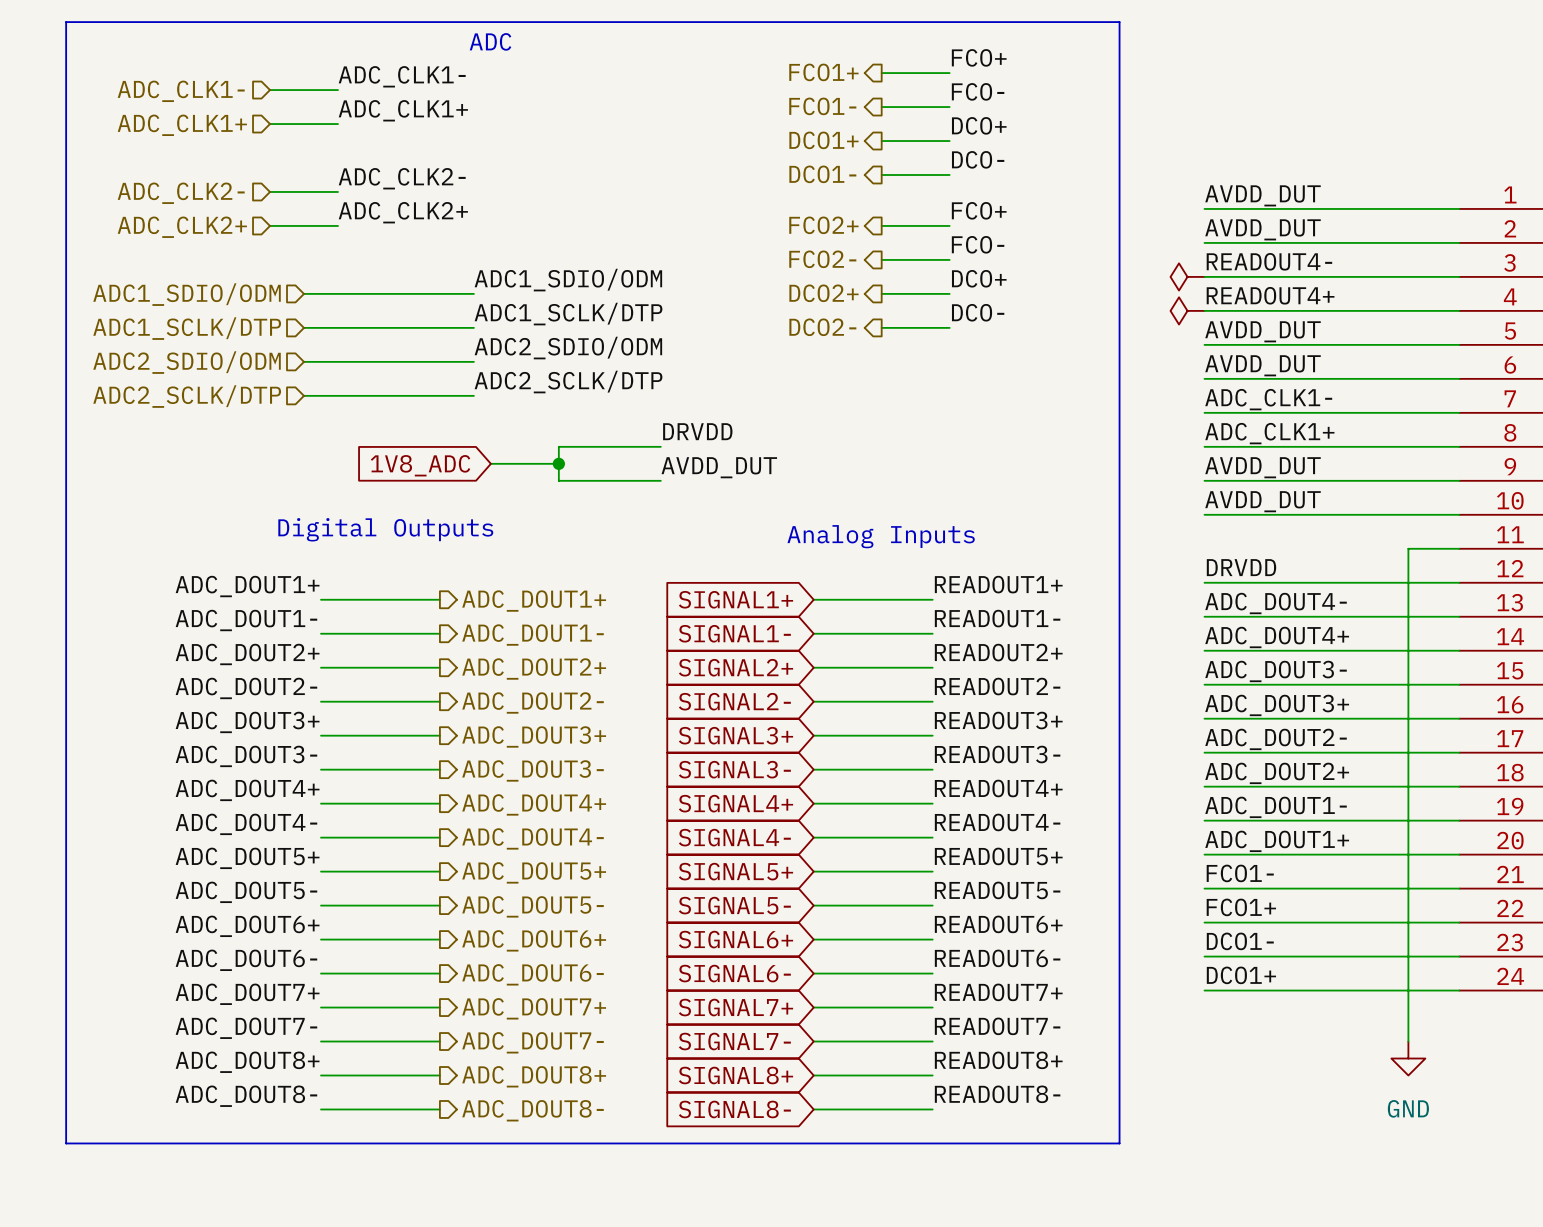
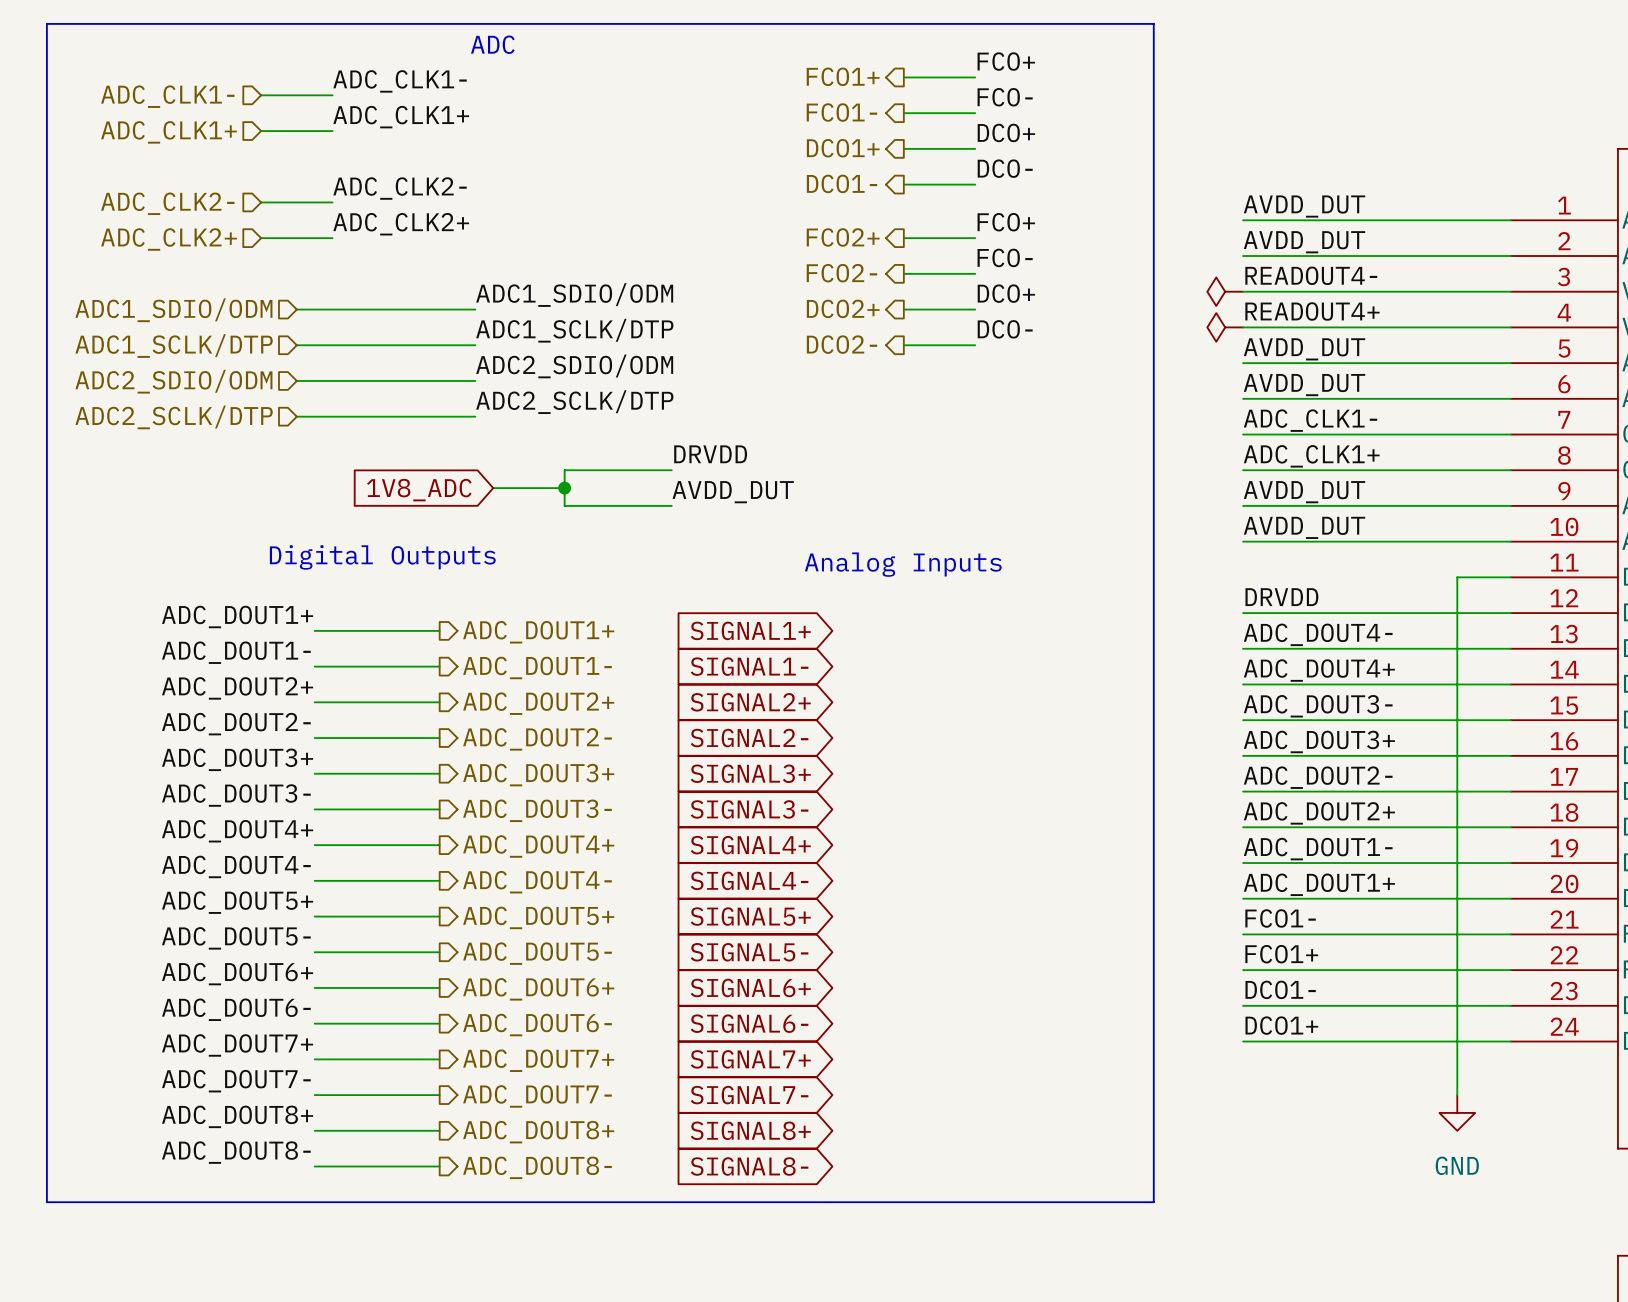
label: READOUT1+ (998, 584) -> none
wire: (813, 599) (932, 599) -> none
label: READOUT1- (997, 618) -> none
wire: (813, 633) (932, 633) -> none
label: READOUT2+ (998, 652) -> none
wire: (813, 667) (932, 667) -> none
label: READOUT2- (997, 686) -> none
wire: (813, 701) (932, 701) -> none
label: READOUT3+ (998, 720) -> none
wire: (813, 735) (932, 735) -> none
label: READOUT3- (997, 754) -> none
wire: (813, 769) (932, 769) -> none
label: READOUT4+ (998, 788) -> none
wire: (813, 803) (932, 803) -> none
label: READOUT4- (997, 822) -> none
wire: (813, 837) (932, 837) -> none
label: READOUT5+ (998, 856) -> none
wire: (813, 871) (932, 871) -> none
label: READOUT5- (997, 890) -> none
wire: (813, 905) (932, 905) -> none
label: READOUT6+ (998, 924) -> none
wire: (813, 939) (932, 939) -> none
label: READOUT6- (997, 958) -> none
wire: (813, 973) (932, 973) -> none
label: READOUT7+ (998, 992) -> none
wire: (813, 1007) (932, 1007) -> none
label: READOUT7- (997, 1026) -> none
wire: (813, 1041) (932, 1041) -> none
label: READOUT8+ (998, 1060) -> none
wire: (813, 1075) (932, 1075) -> none
label: READOUT8- (997, 1094) -> none
wire: (813, 1109) (932, 1109) -> none

